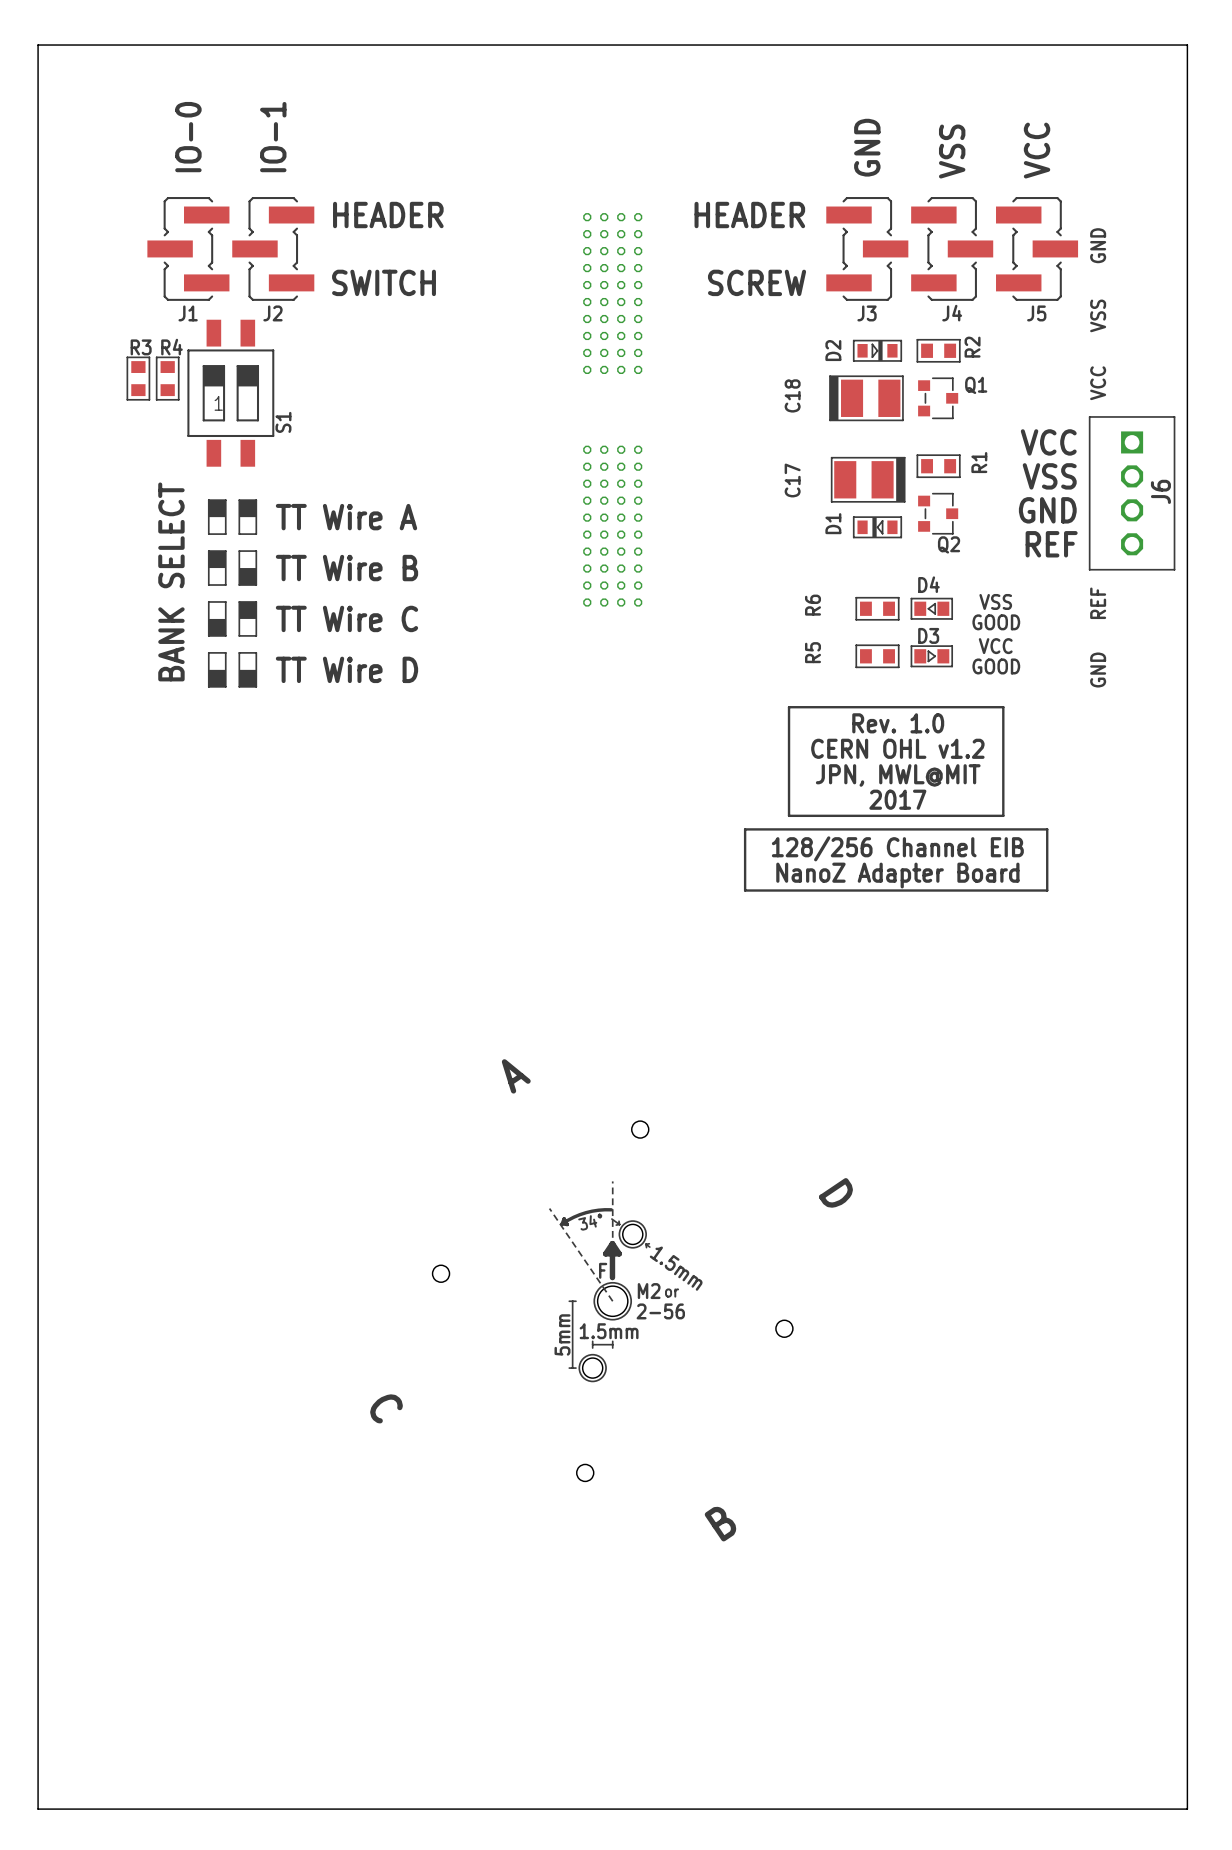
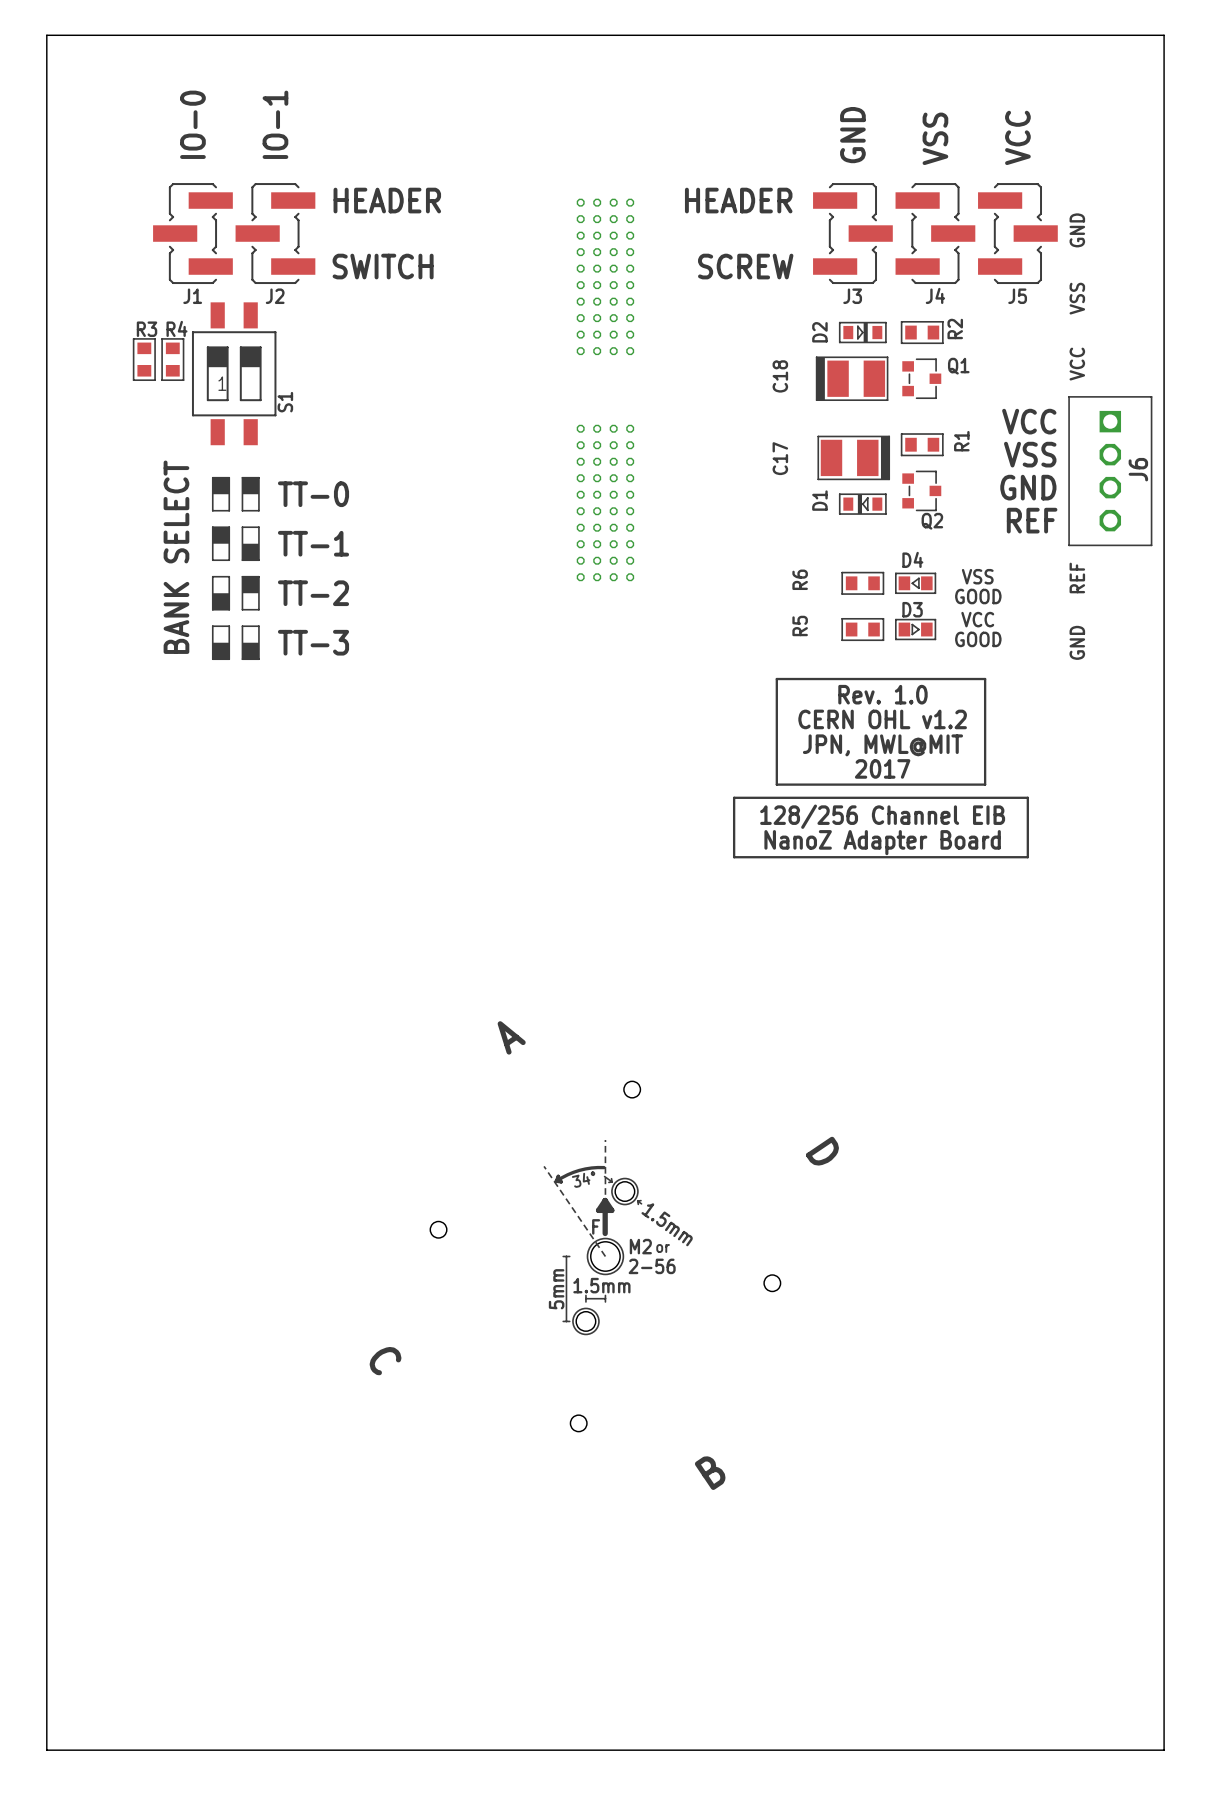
text: TT Wire A (346, 517) -> TT-0 (313, 494)
text: TT Wire B (346, 568) -> TT-1 (313, 543)
text: TT Wire C (346, 618) -> TT-2 (313, 593)
text: TT Wire D (346, 669) -> TT-3 (313, 642)

